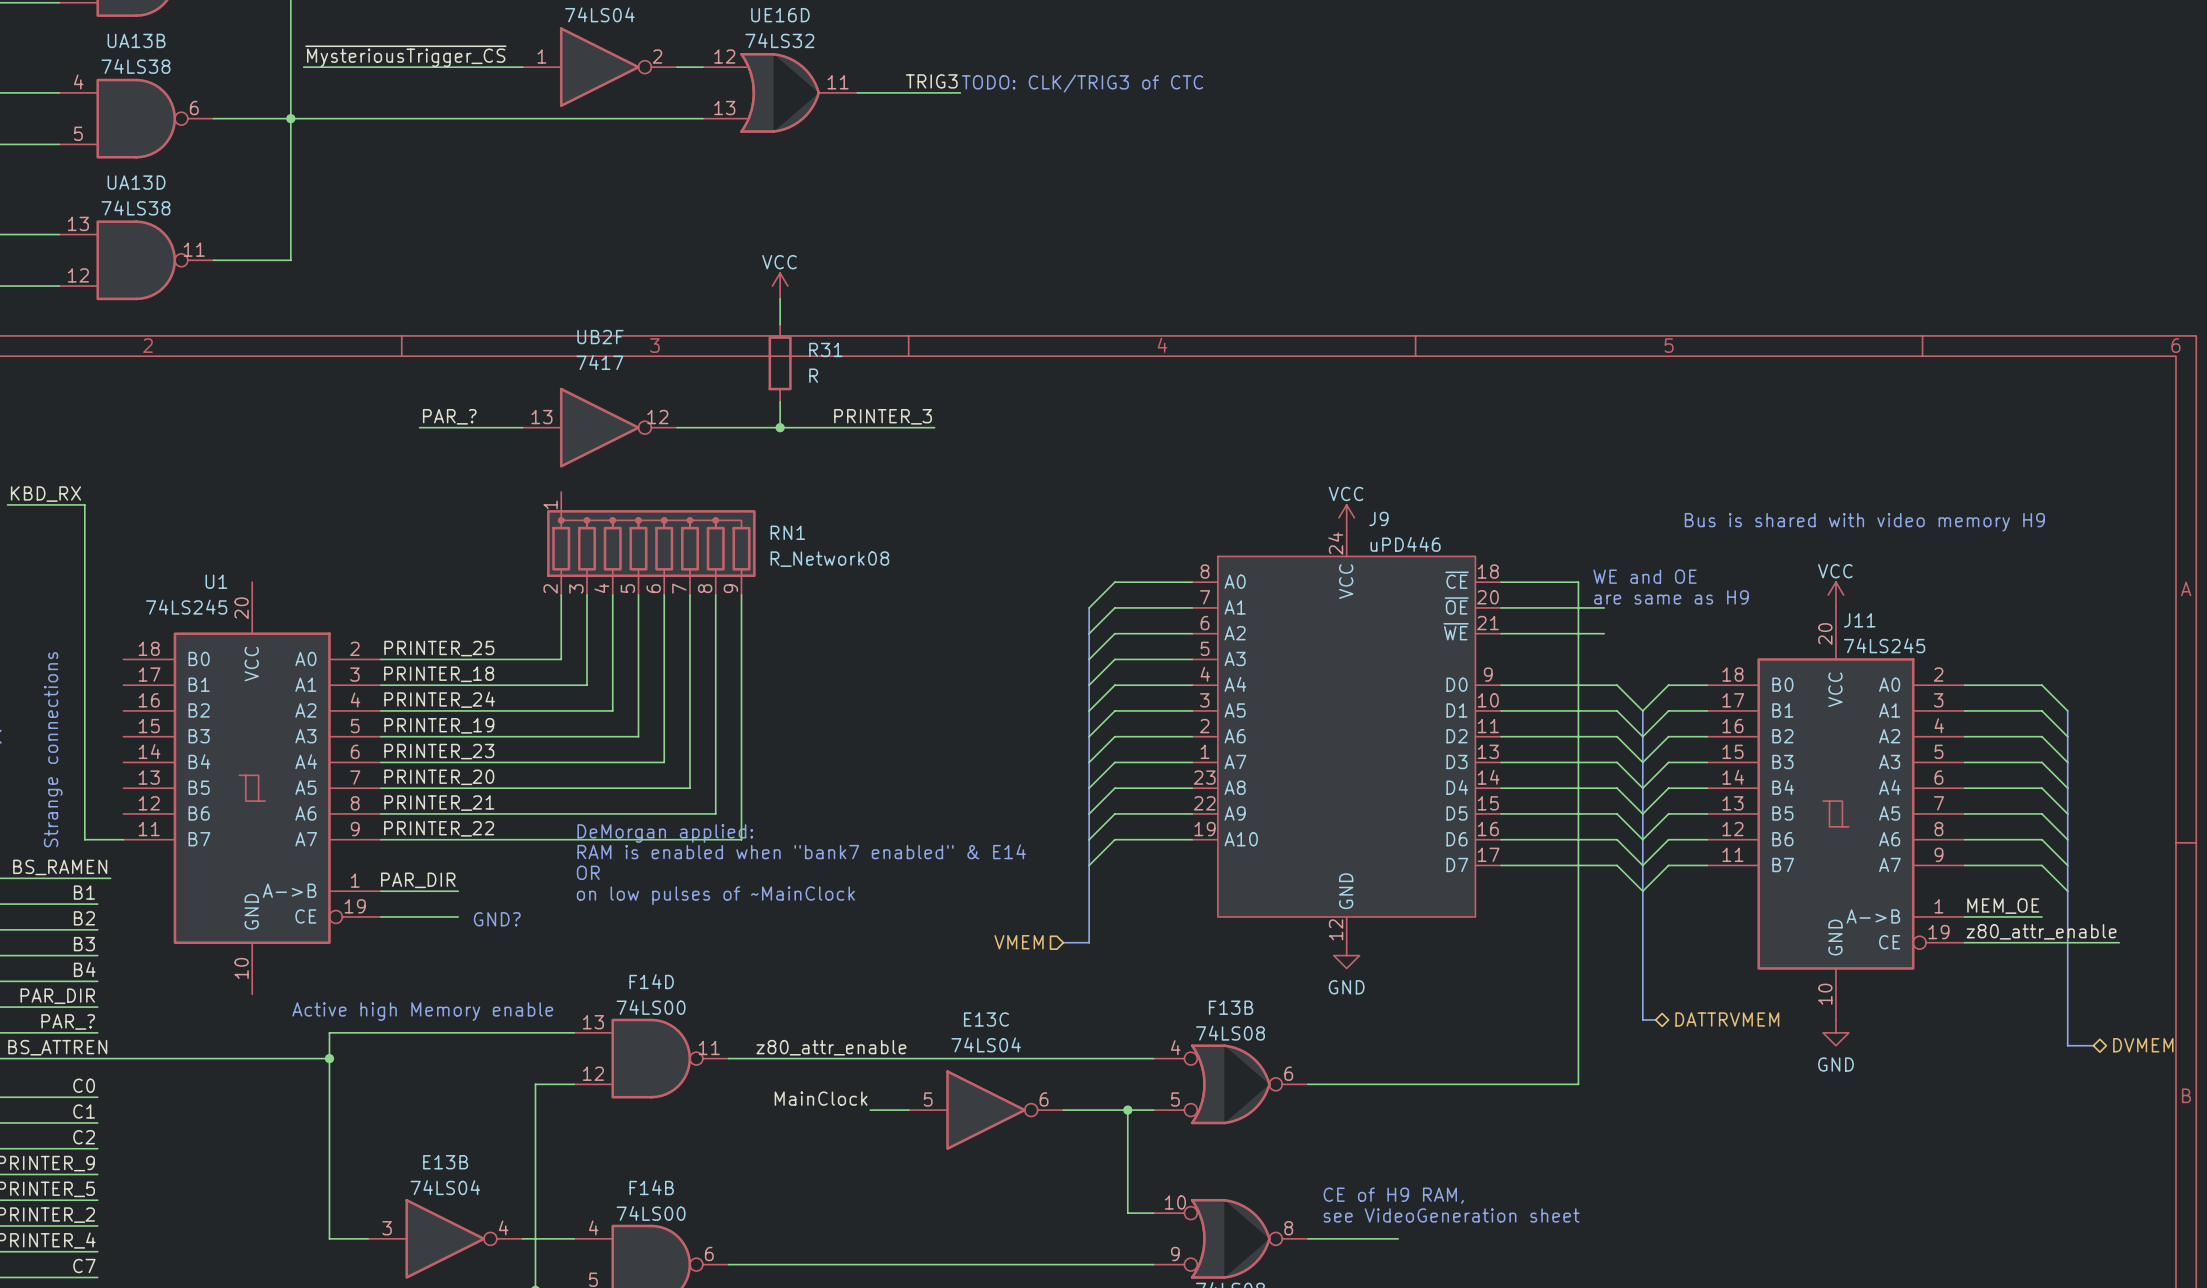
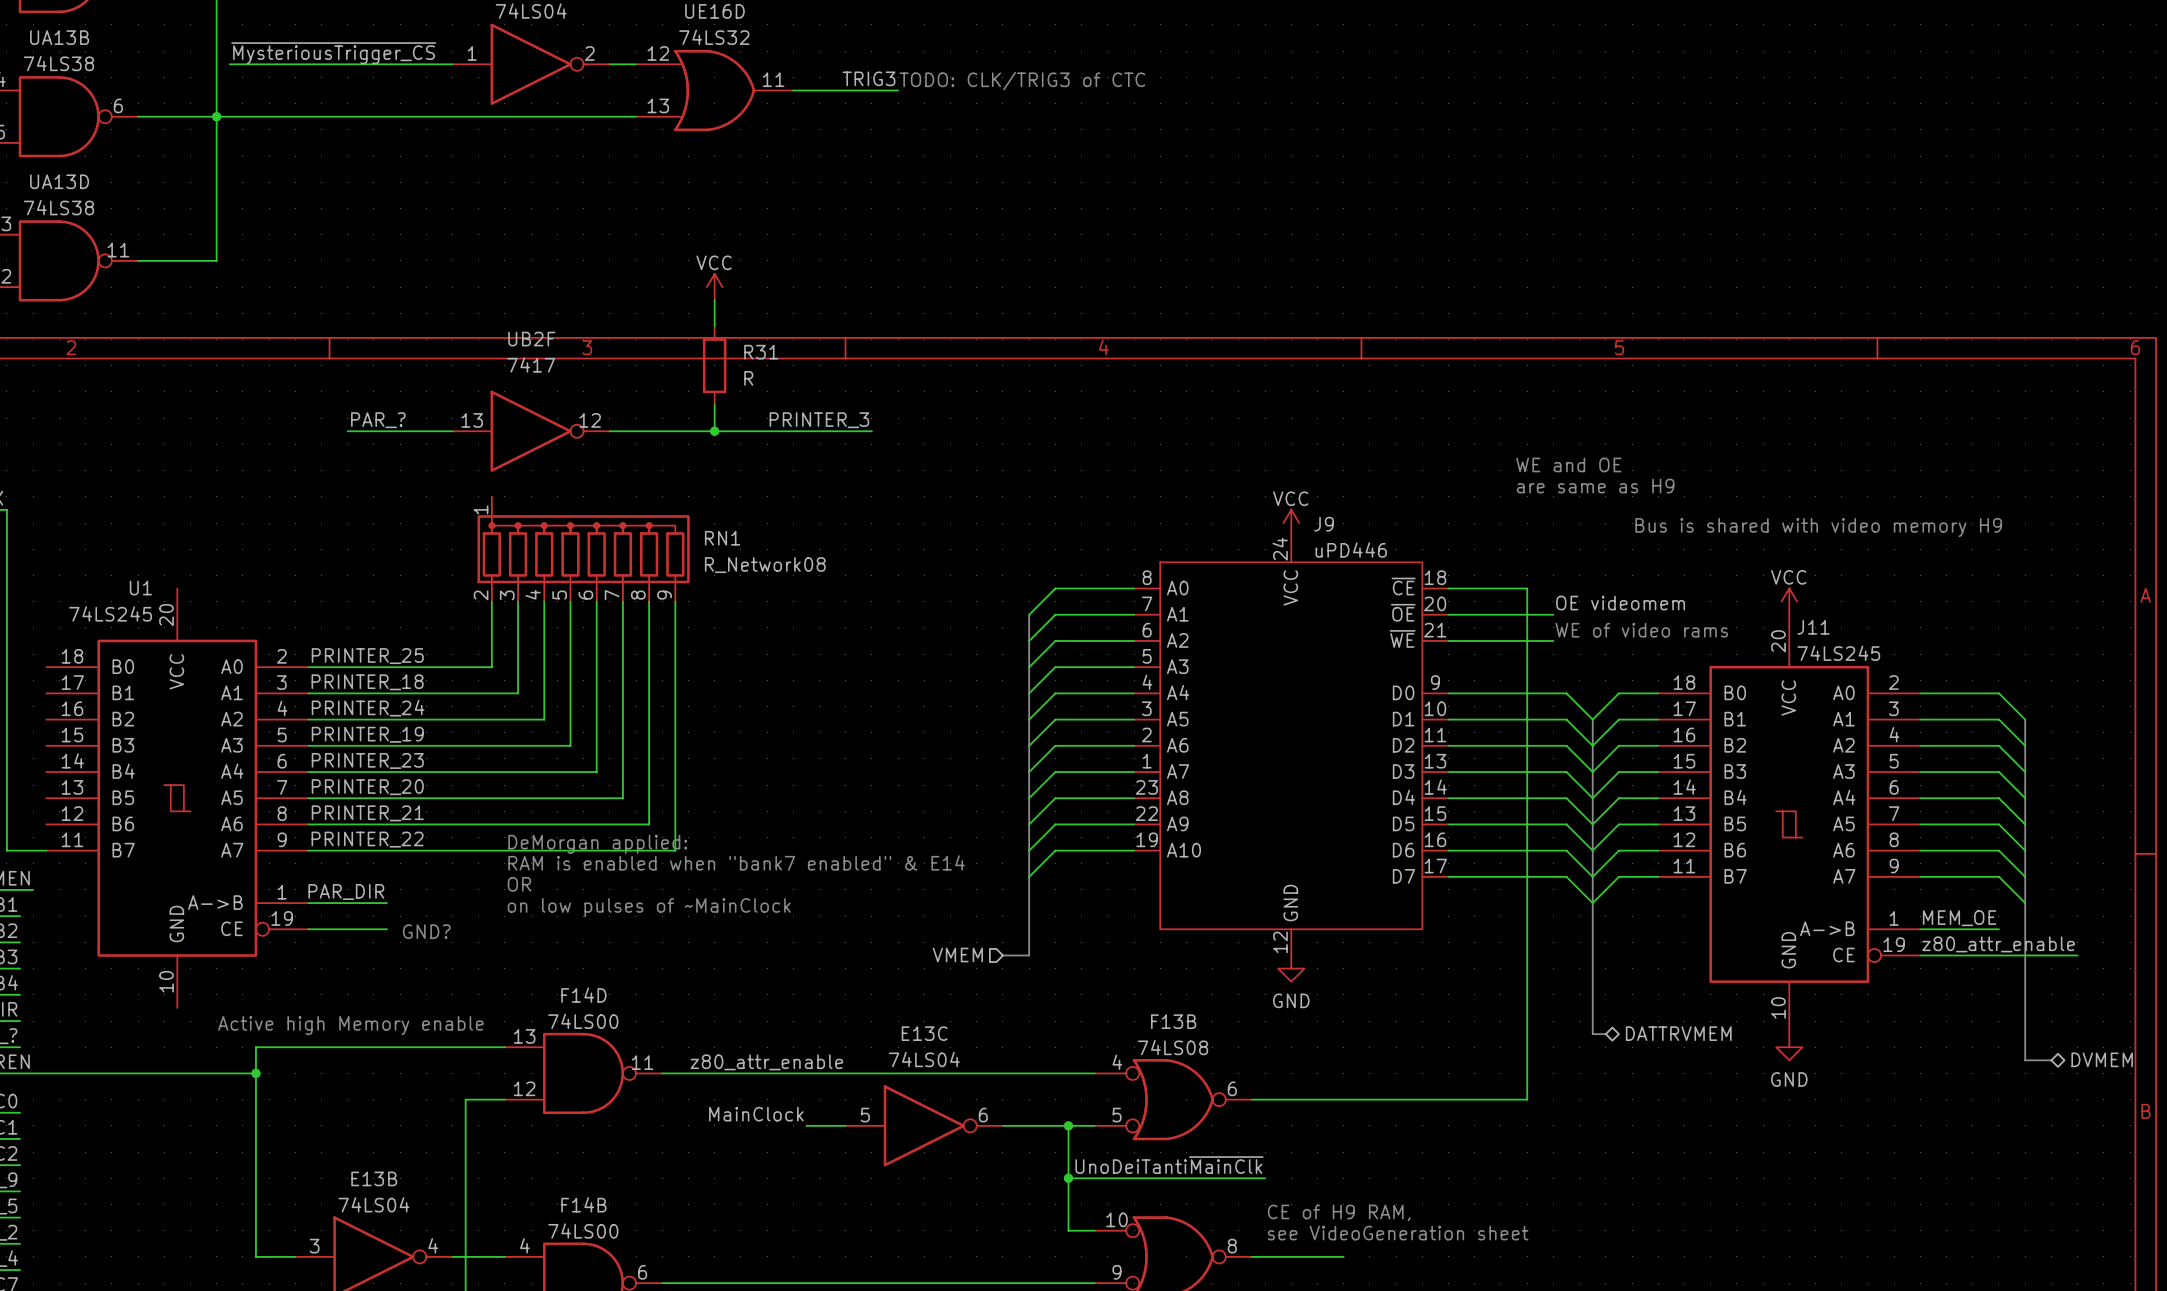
text position: WE and OE (1645, 576) -> WE and OE (1568, 464)
label: none -> OE videomem (1620, 603)
text position: are same as H9 (1671, 597) -> are same as H9 (1595, 486)
text: none -> WE of video rams (1641, 630)
label: none -> UnoDeiTanti~{MainClk} (1169, 1165)
wire: none -> (1068, 1178) (1265, 1178)
junction: none -> (1068, 1178)

